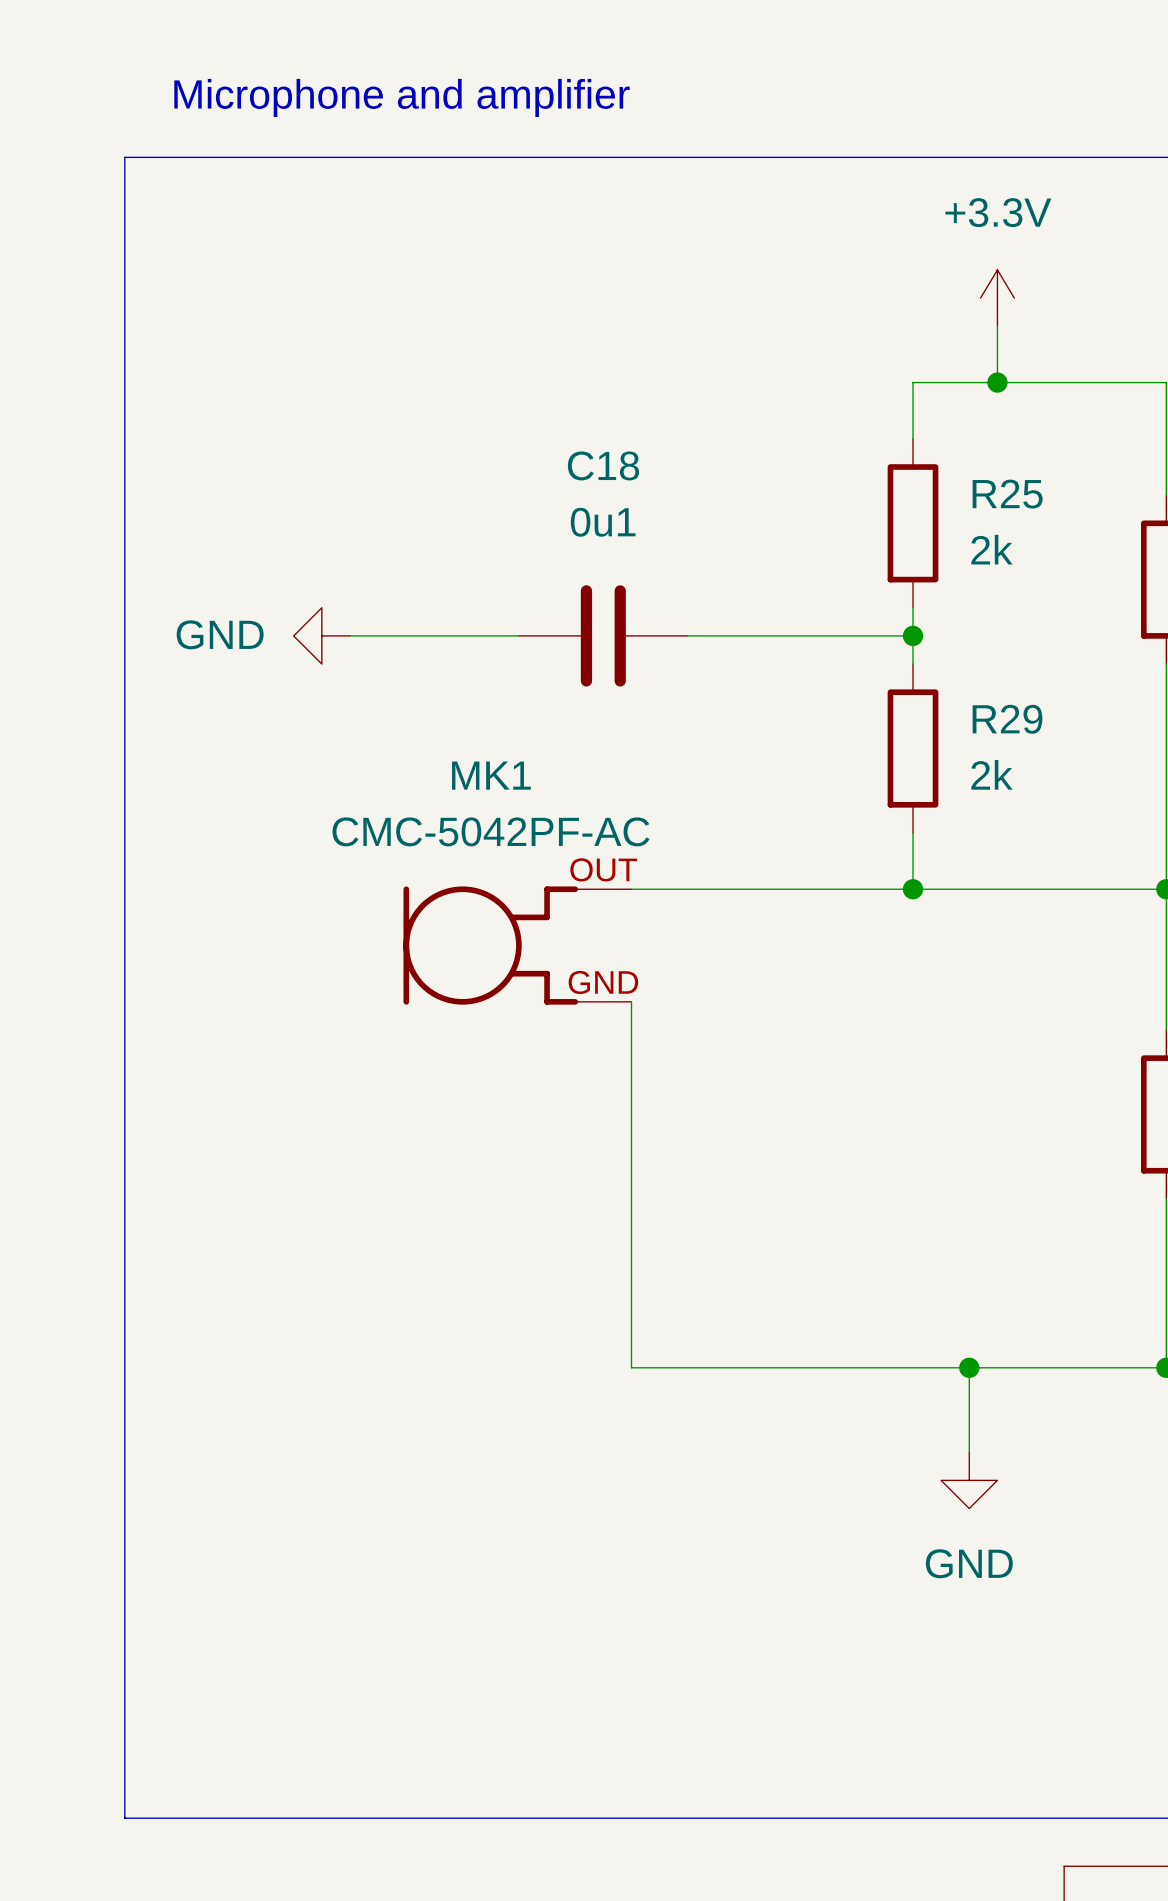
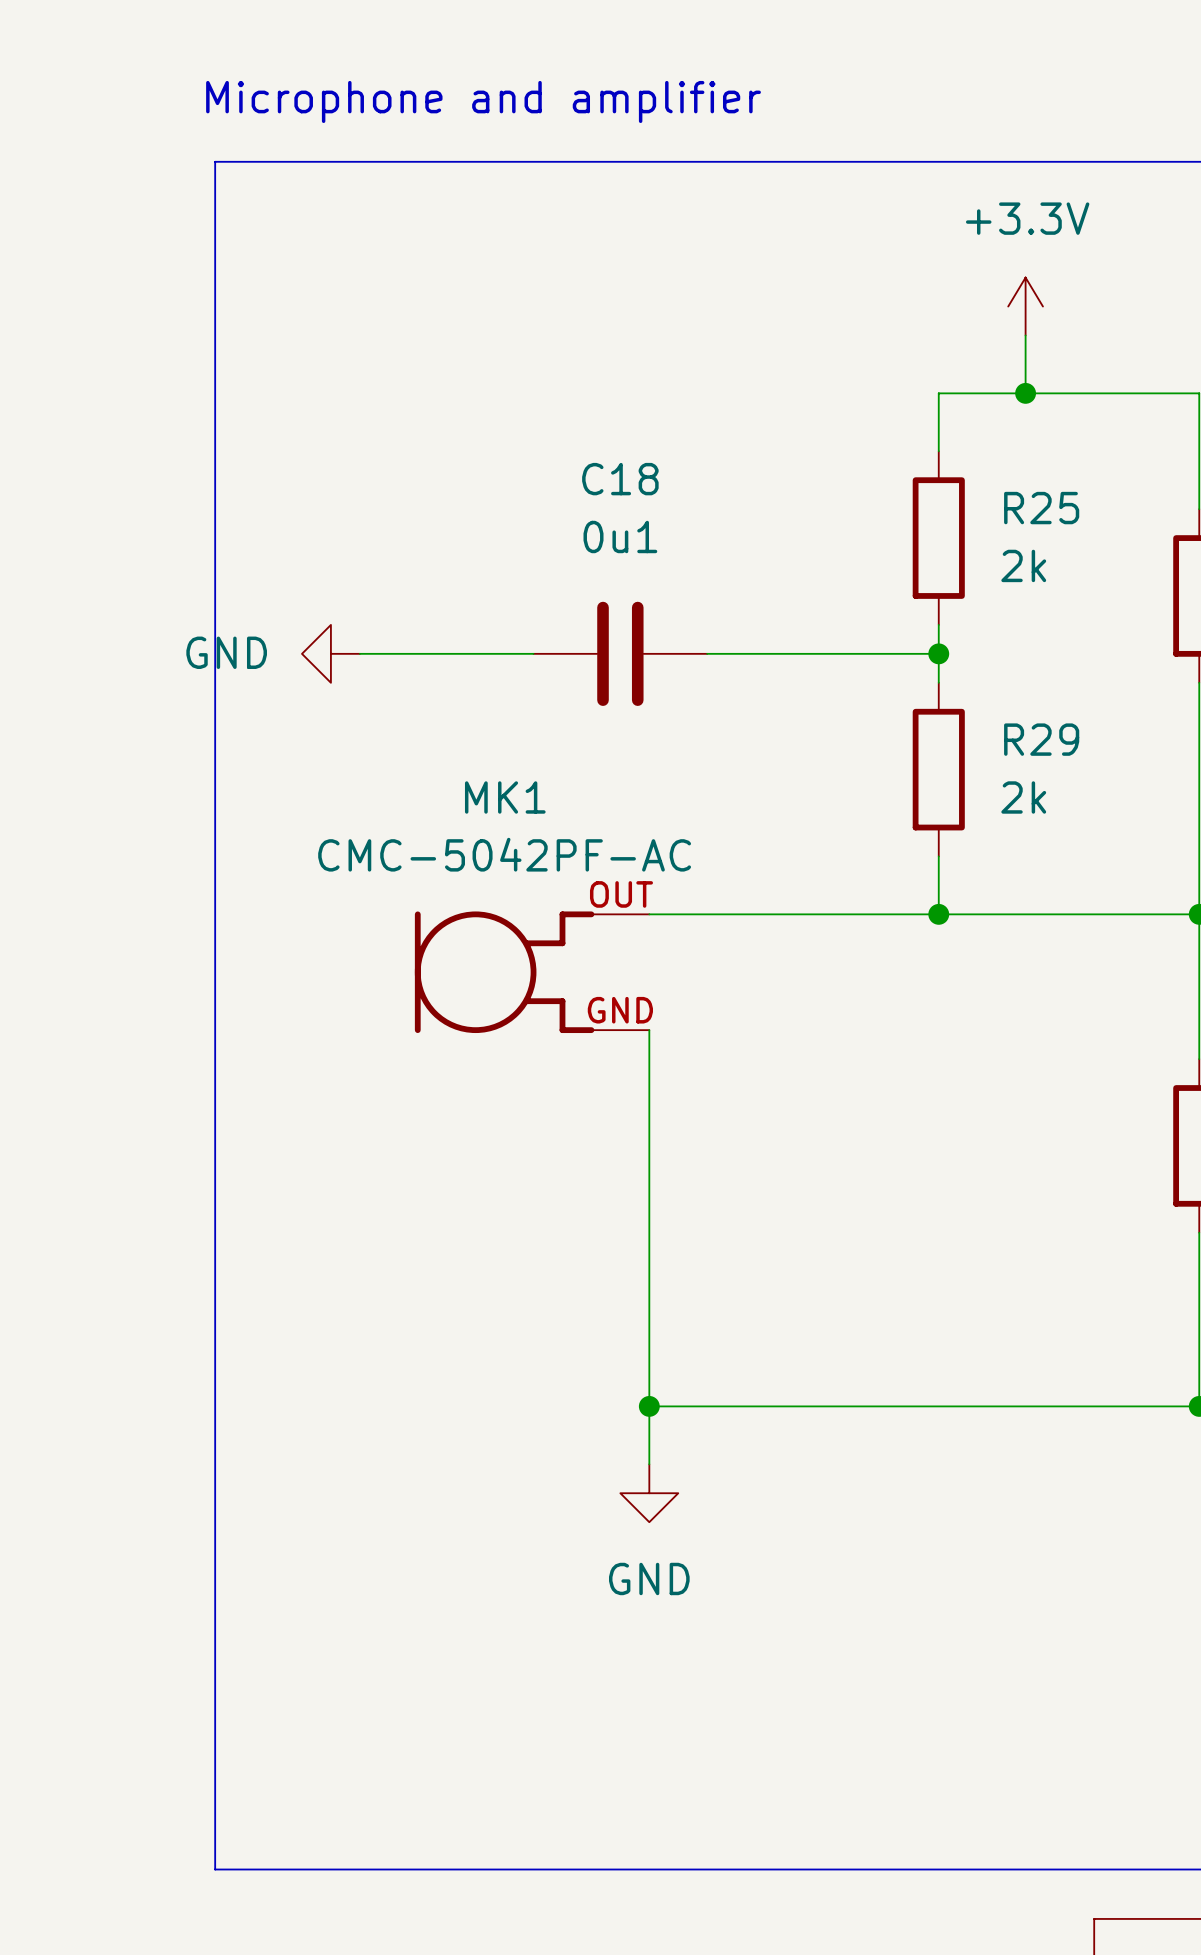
text position: Microphone and amplifier (402, 97) -> Microphone and amplifier (483, 101)
line: (209, 157) (124, 157) (124, 1818) (209, 1818) -> (215, 161) (215, 1869)
wire: none -> (649, 1406) (649, 1464)
junction: none -> (649, 1406)
wire: (969, 1367) (969, 1452) -> none
junction: (969, 1367) -> none
power symbol position: GND (969, 1480) -> GND (649, 1493)

